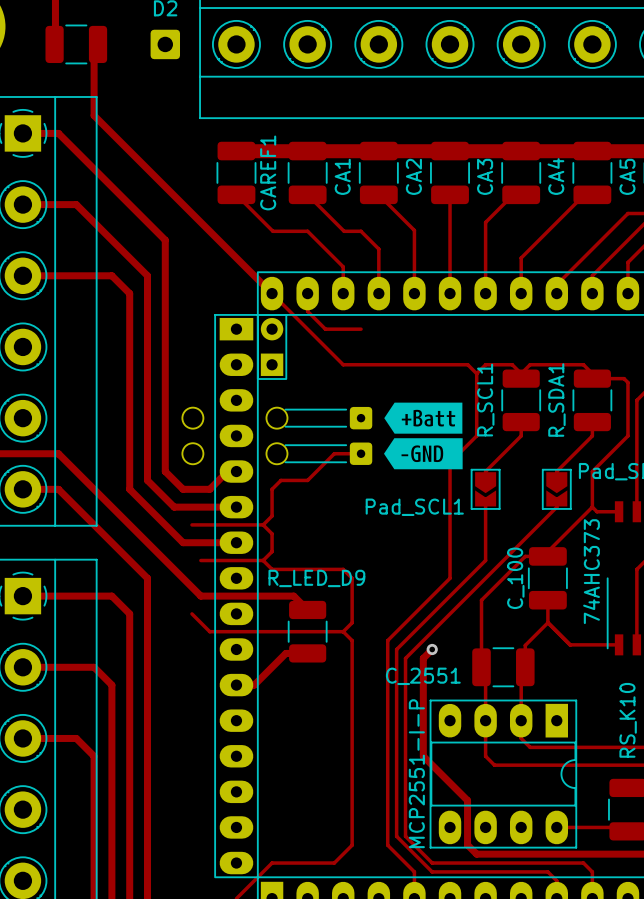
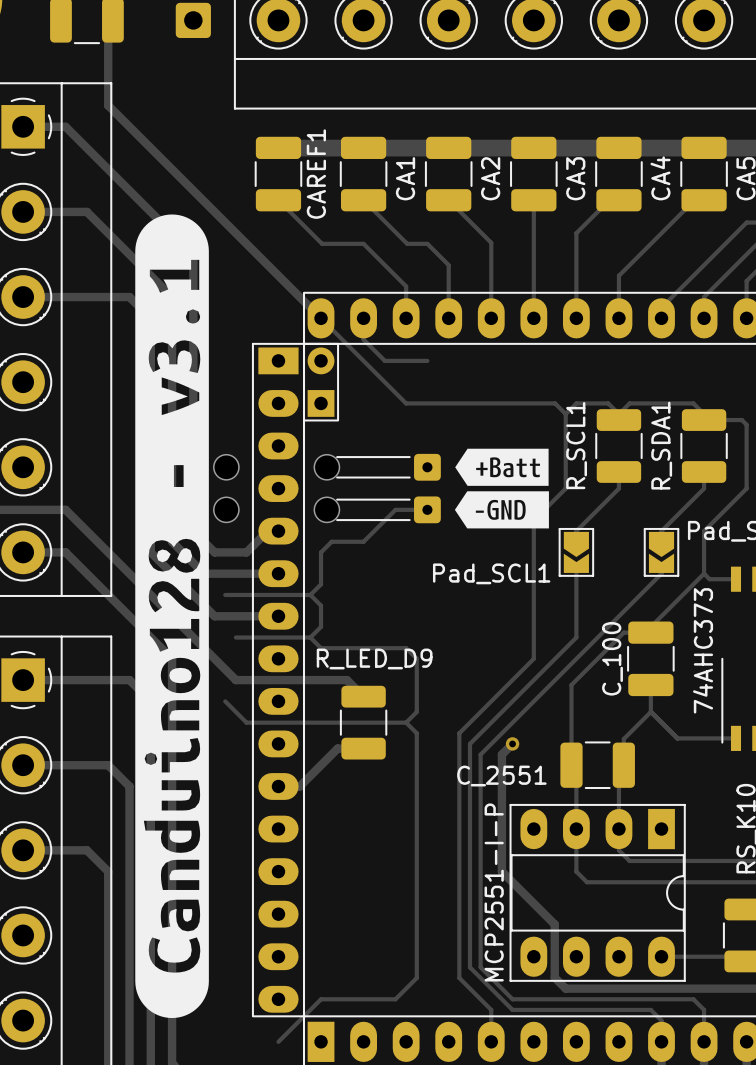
drawing: none -> [135, 214, 209, 1019]

